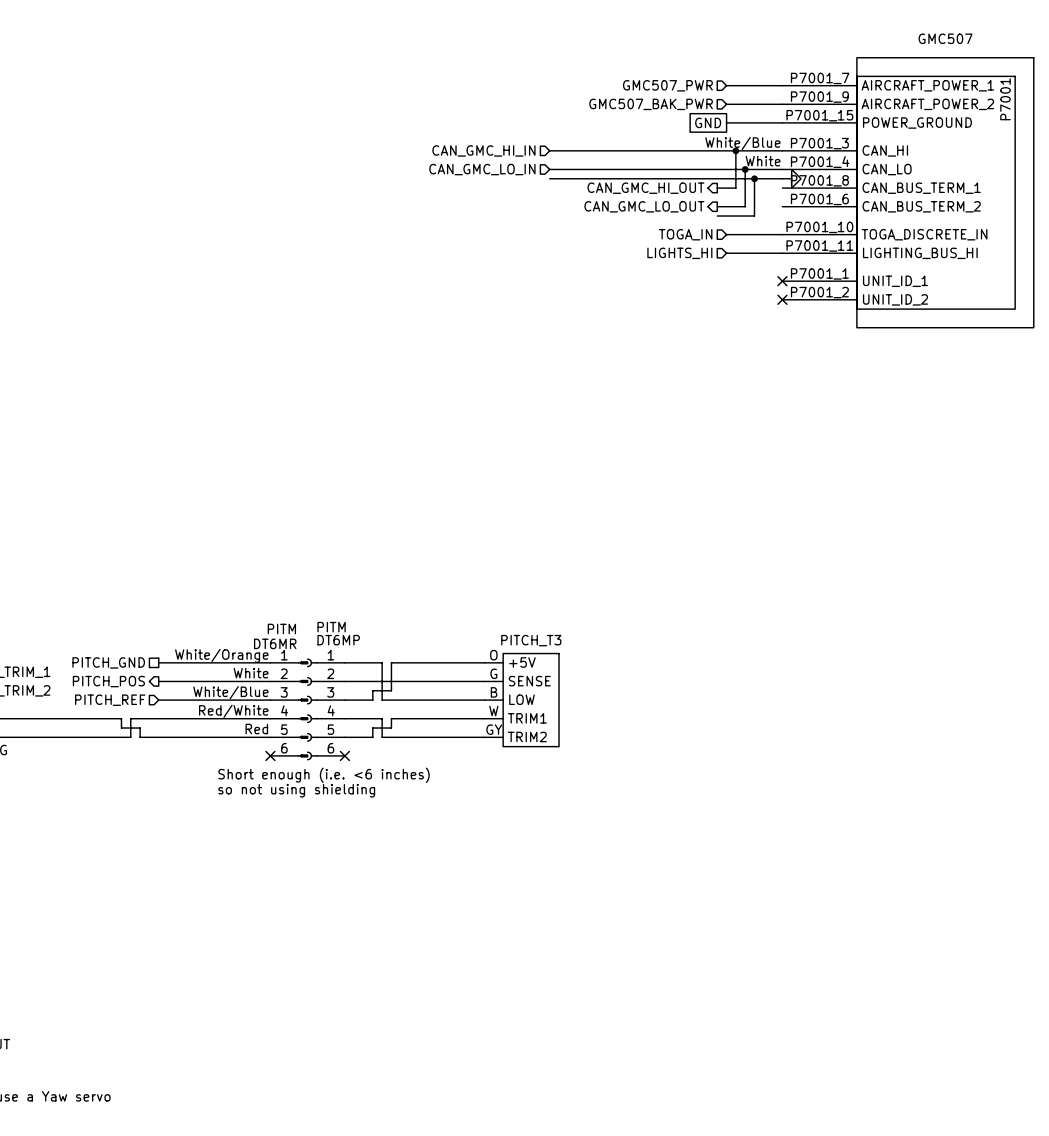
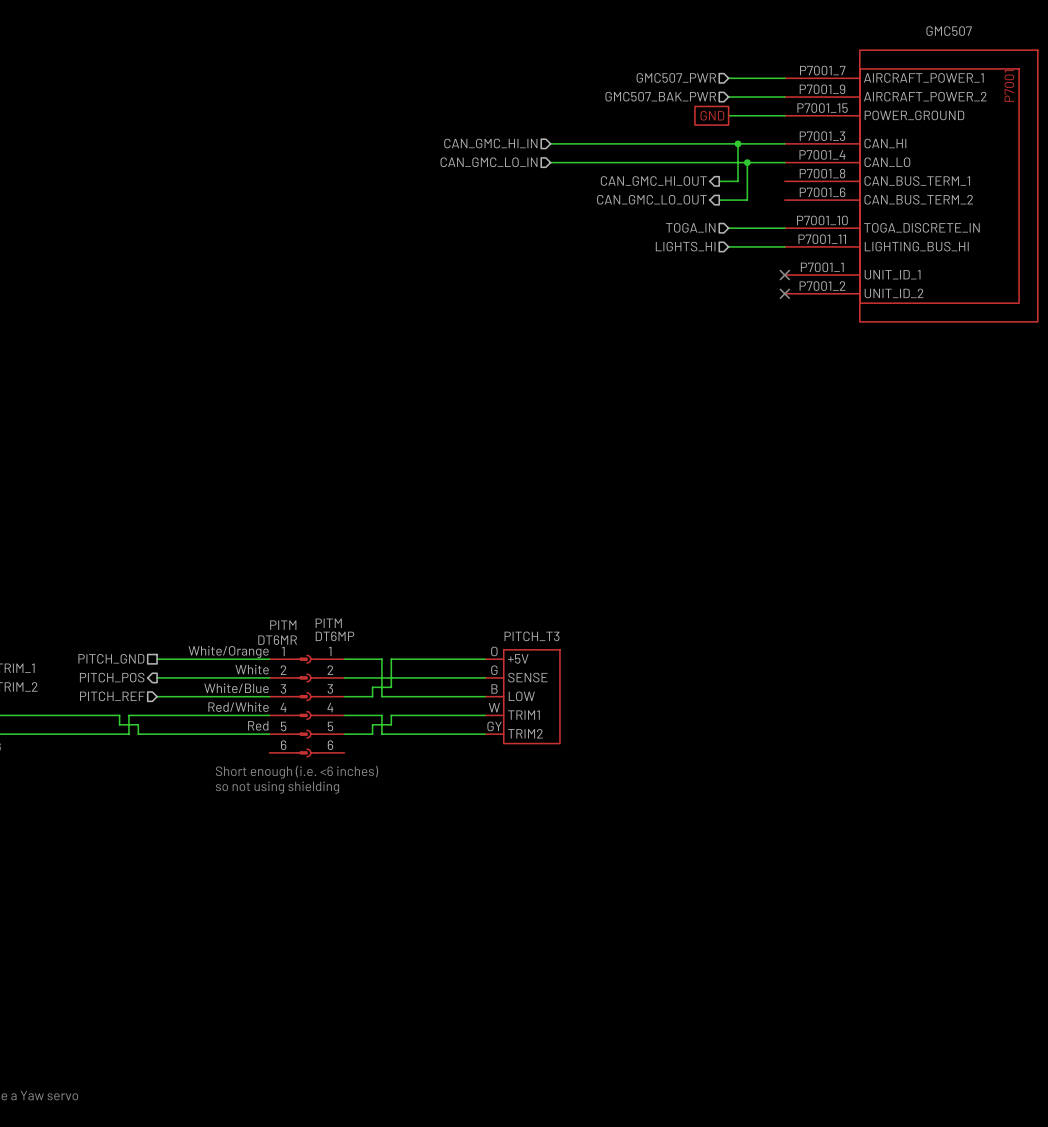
label: White/Blue (742, 143) -> none
label: White (763, 161) -> none
wire: (549, 178) (782, 178) -> none
wire: (754, 178) (754, 216) (717, 216) -> none
junction: (754, 178) -> none
power symbol: (791, 178) -> none
no-connect mark: (270, 755) -> none
no-connect mark: (344, 755) -> none

